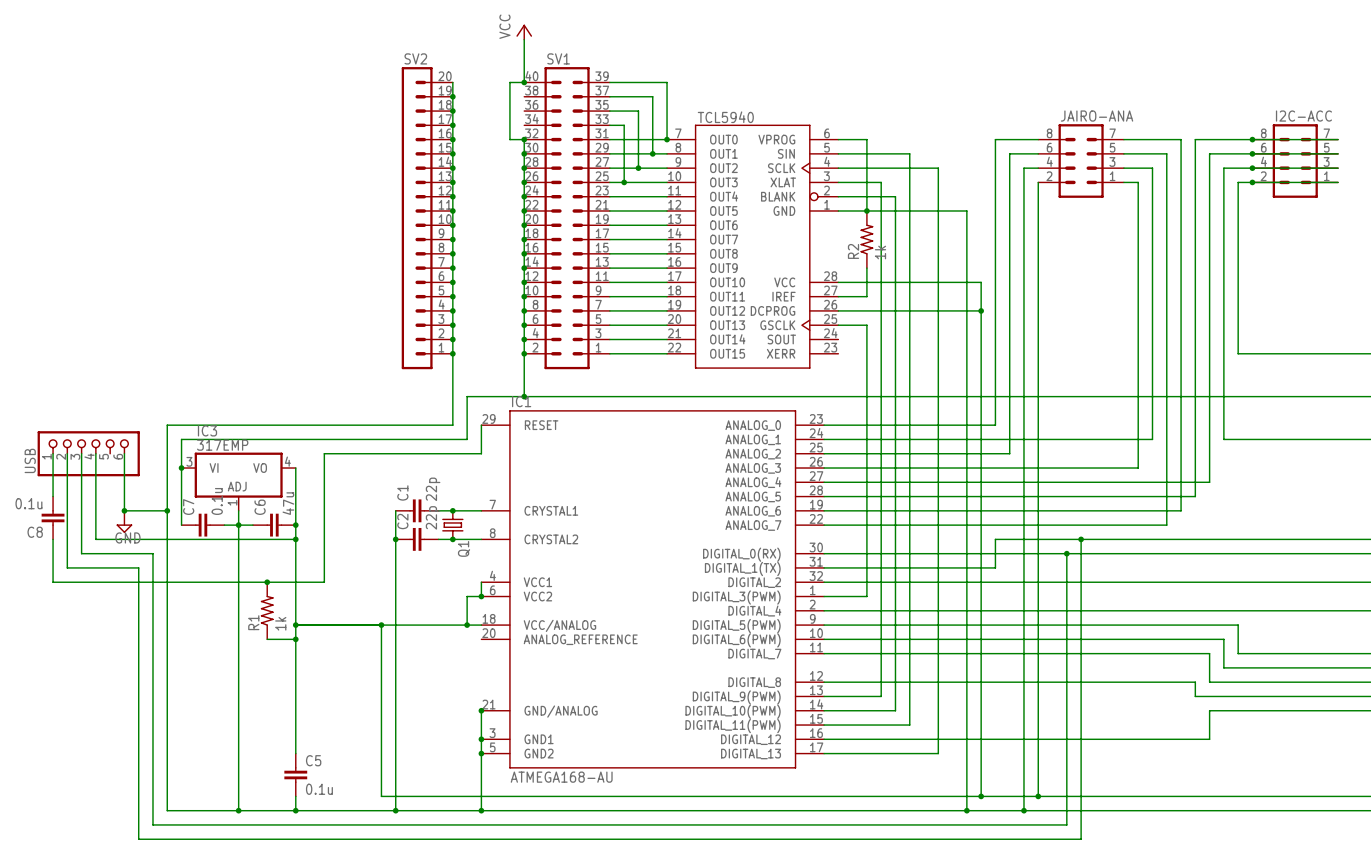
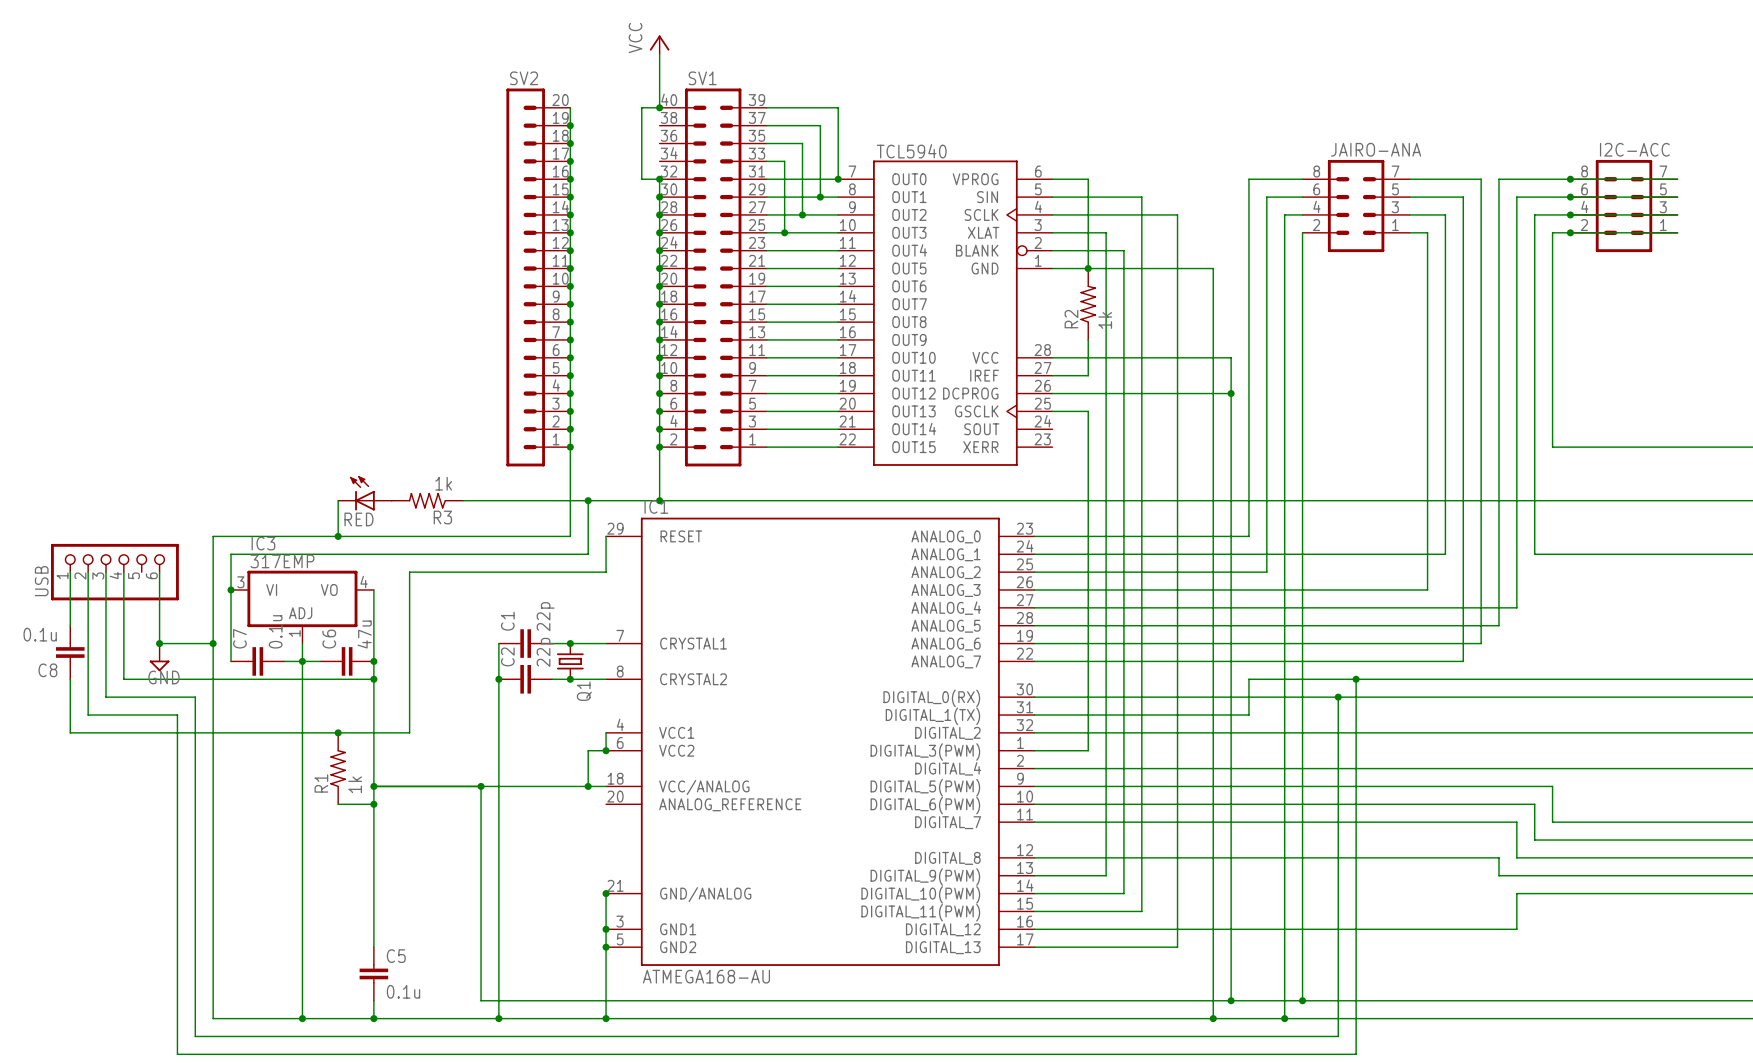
RED: none -> (364, 493)
wire: none -> (338, 500) (338, 536)
R3: none -> 1k (427, 500)
wire: none -> (463, 500) (588, 500)
junction: none -> (588, 500)
junction: none -> (338, 536)

